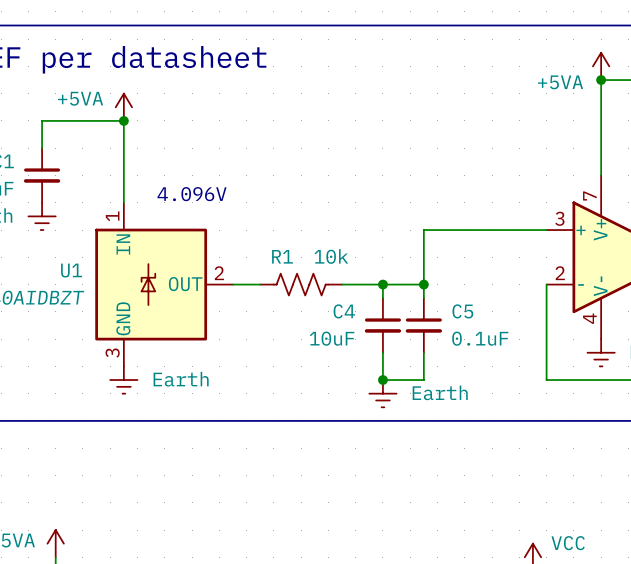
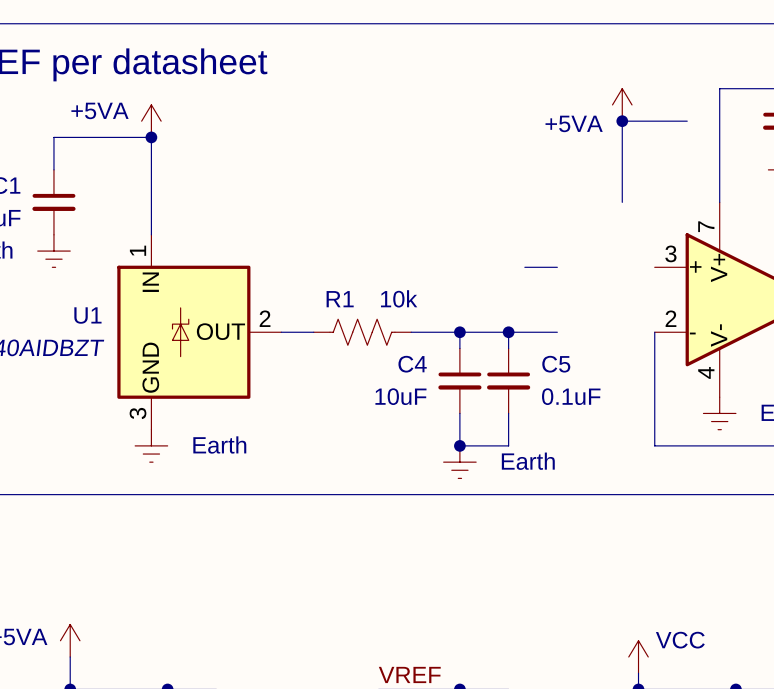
power symbol position: +5VA (601, 66) -> +5VA (622, 104)
junction: (601, 80) -> none
junction: none -> (622, 121)
wire: none -> (687, 121) (622, 121) (622, 202)
text: 4.096V (192, 194) -> none
wire: (437, 230) (423, 230) (423, 284) -> (557, 332) (508, 332)
wire: (464, 230) (546, 230) -> none

